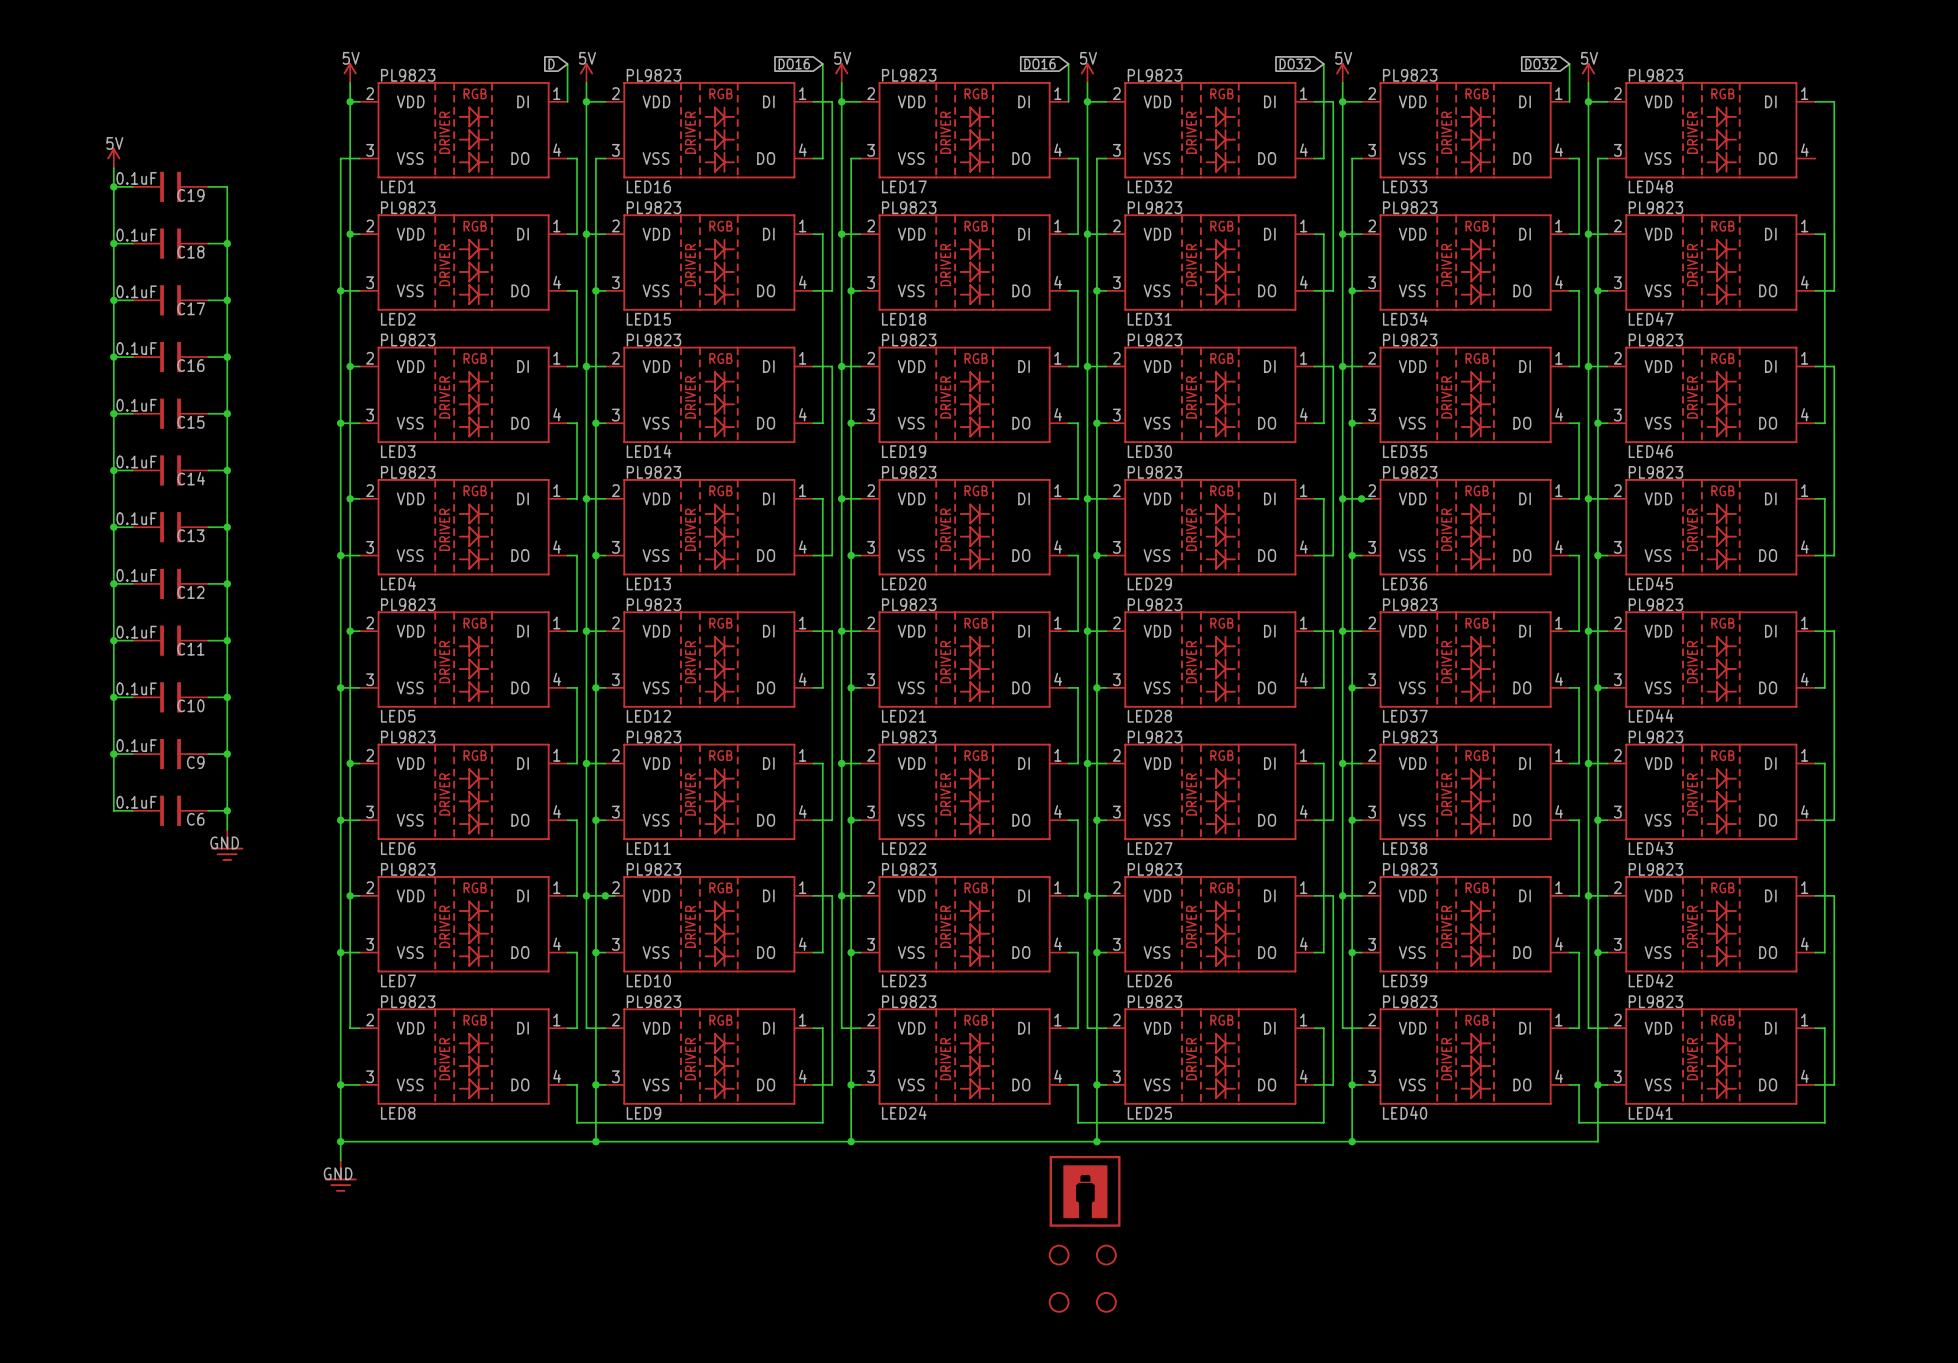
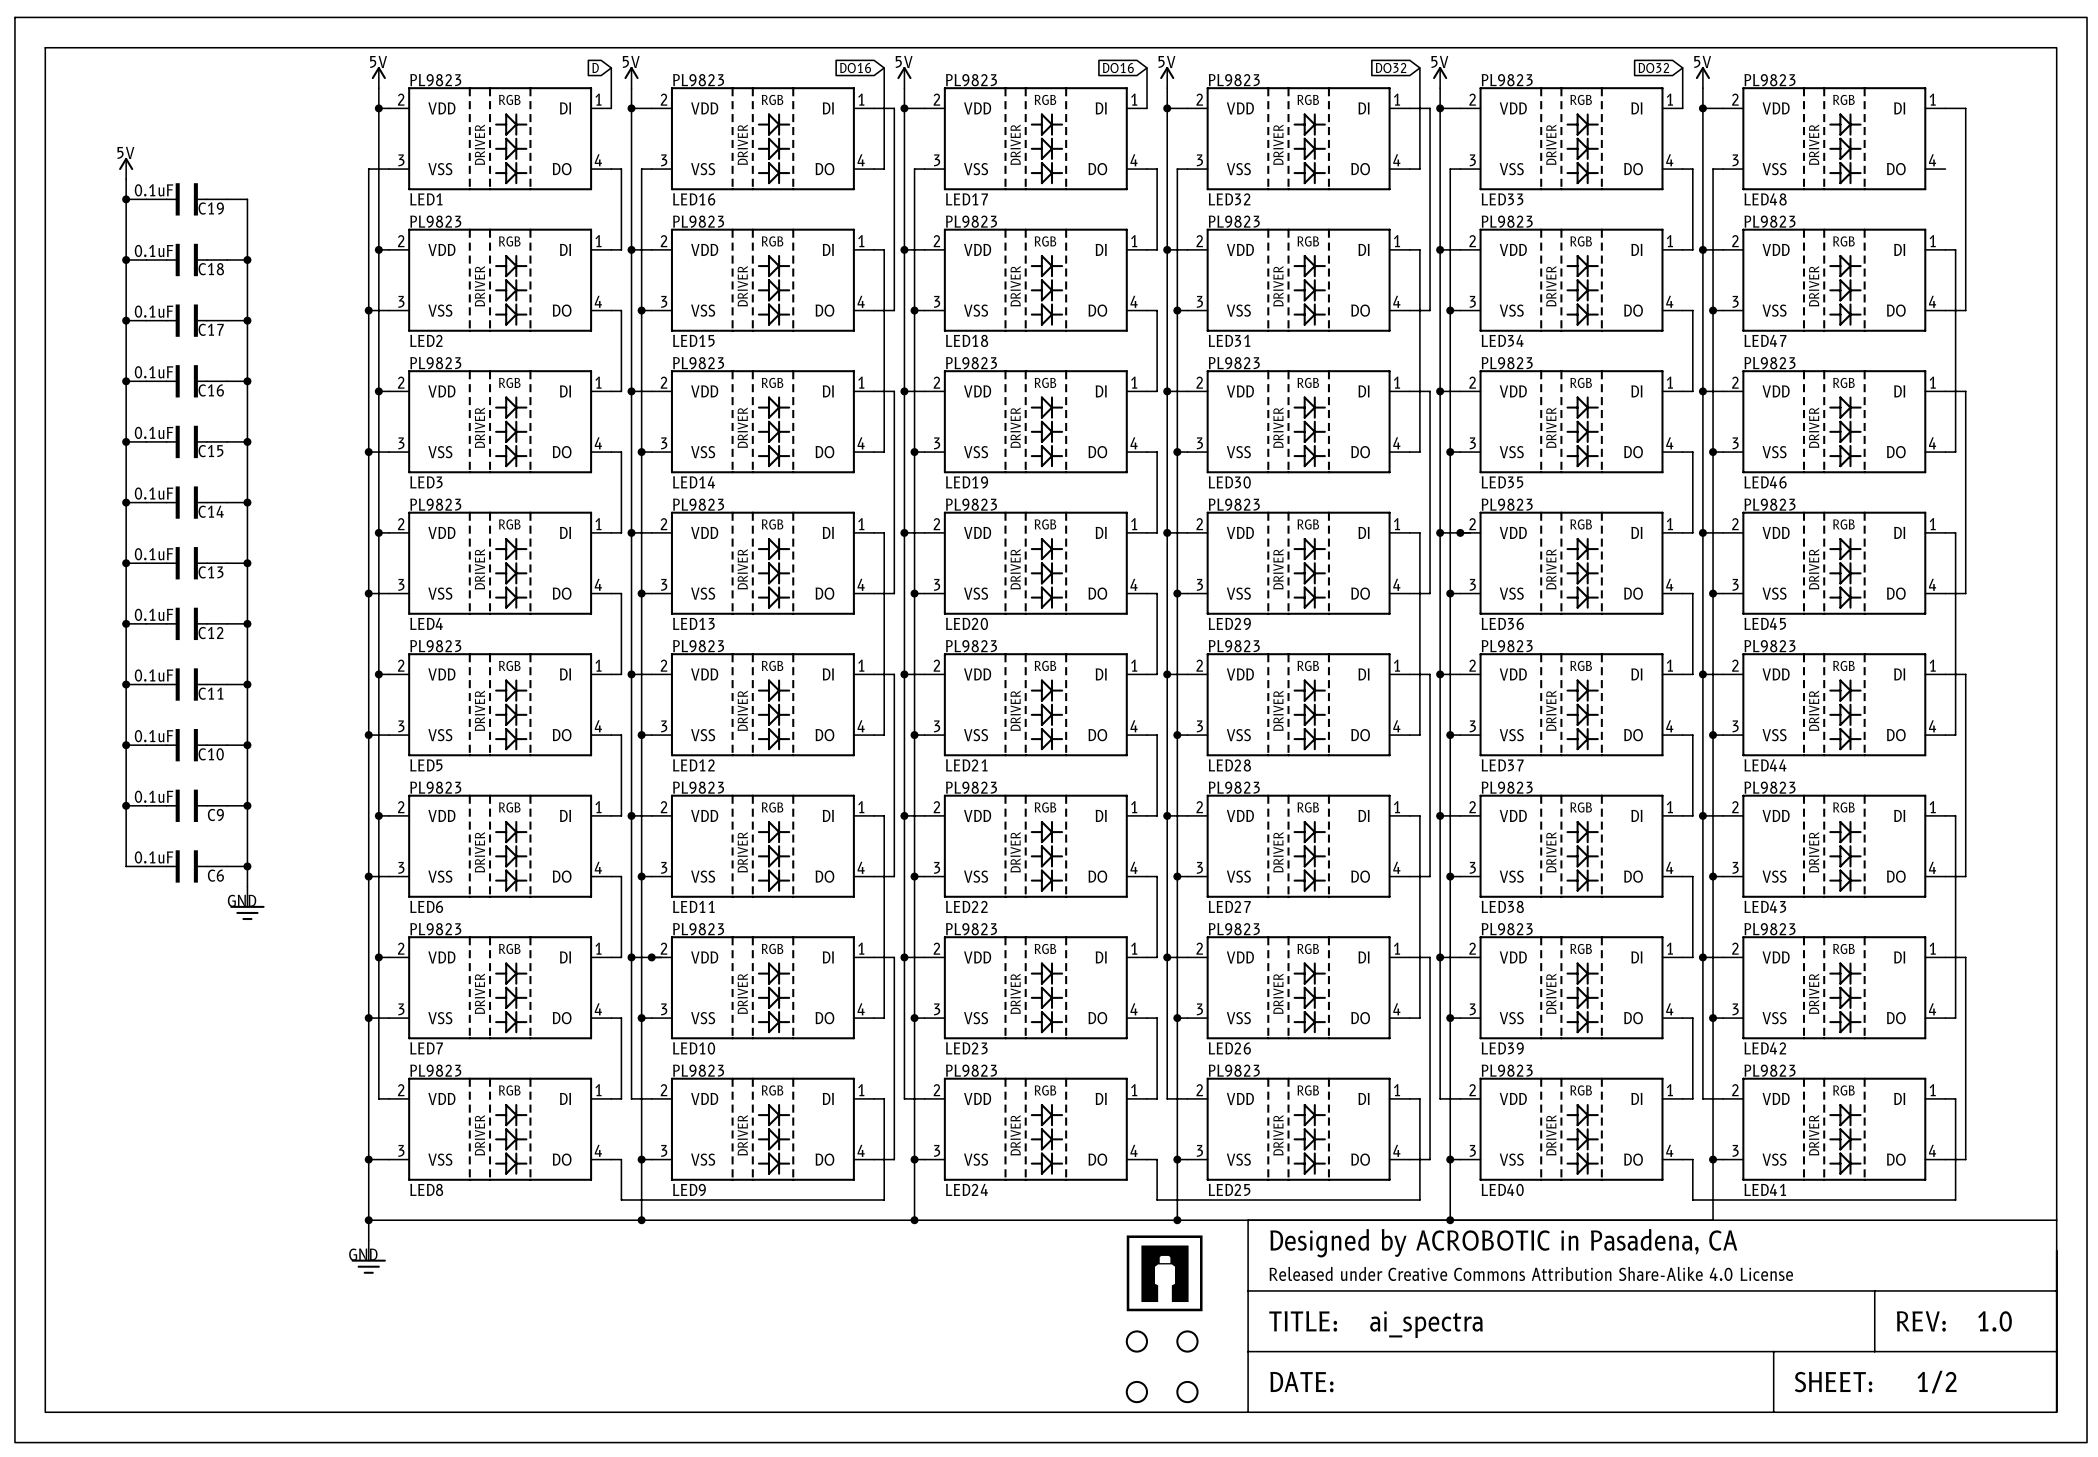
part: none -> (1050, 730)
part: none -> (1652, 1316)

